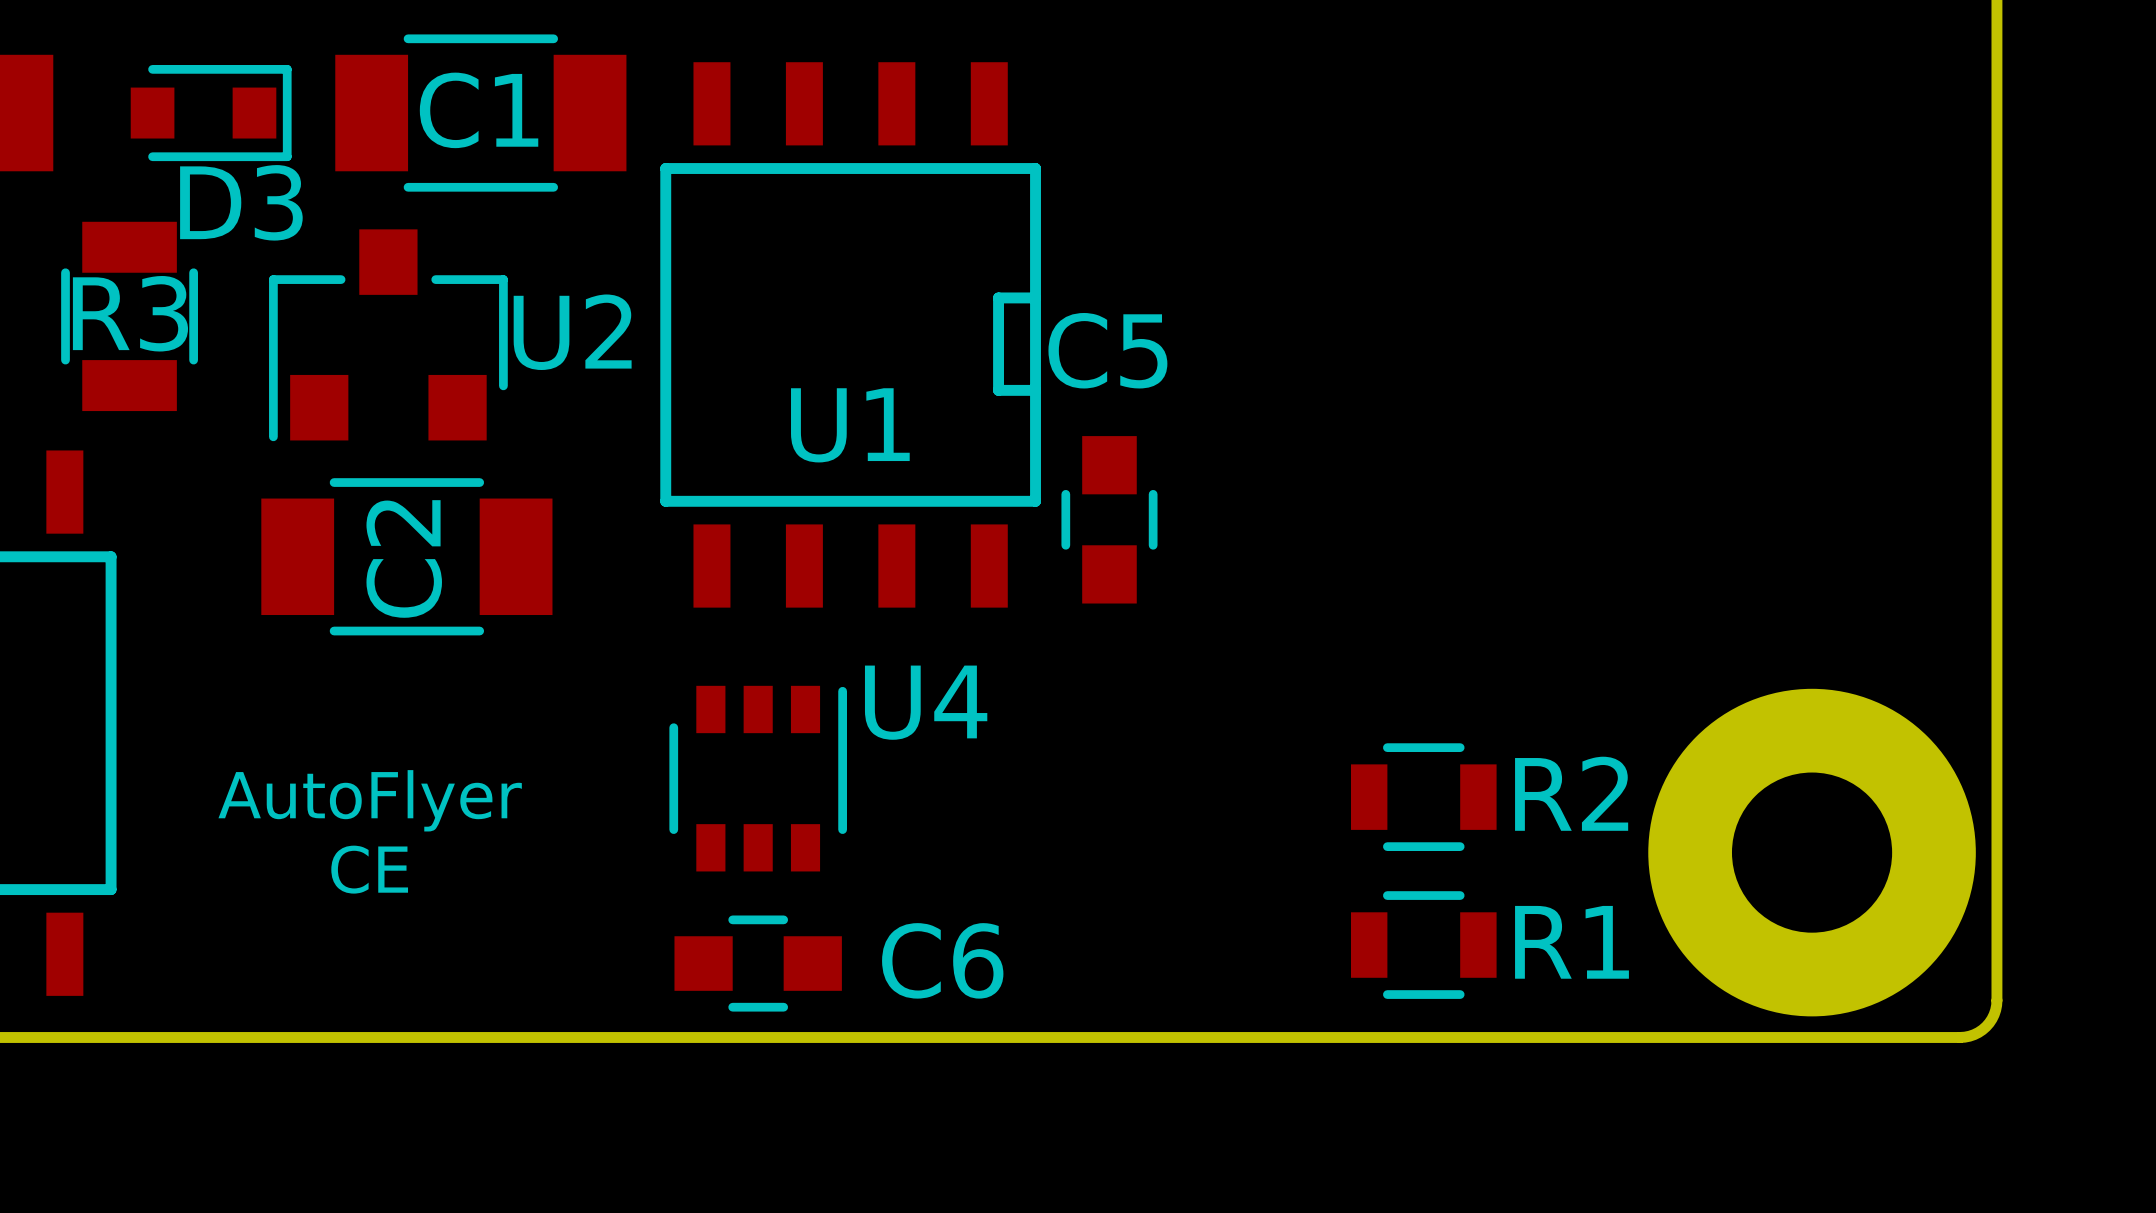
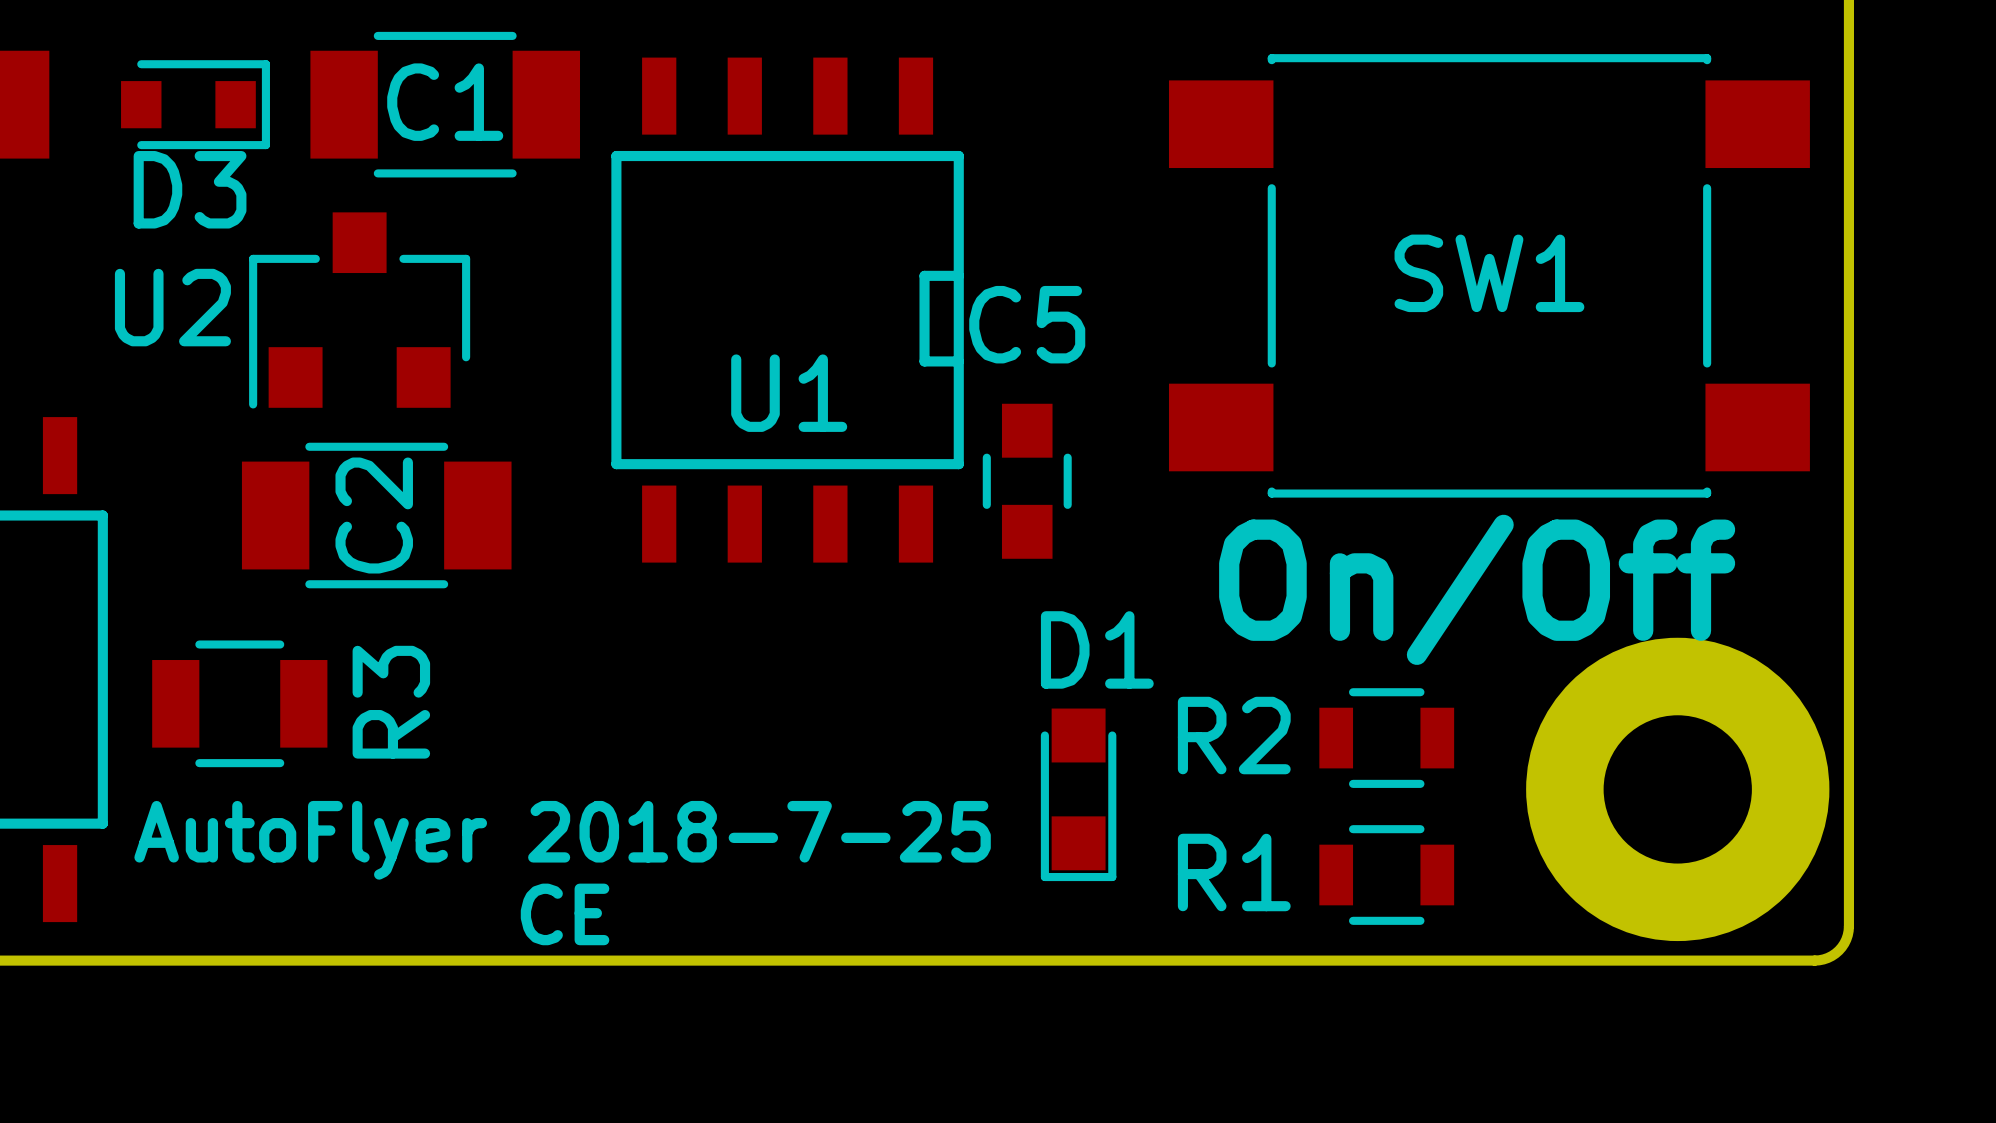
D3 name position: D3 (241, 202) -> D3 (190, 189)
SW1: none -> (1489, 275)
R3 name position: R3 (130, 313) -> R3 (391, 702)
R3 rotation: 0° (129, 316) -> 90° clockwise (239, 703)
R3 position: (129, 316) -> (239, 703)
U2 name position: U2 (572, 332) -> U2 (172, 307)
text: none -> On/Off (1477, 589)
U4: (758, 778) -> none
R2 name position: R2 (1571, 793) -> R2 (1234, 735)
R2 position: (1423, 797) -> (1386, 738)
text: AutoFlyer (370, 800) -> AutoFlyer 2018-7-25 (562, 840)
D1: none -> (1078, 794)
text position: CE (369, 869) -> CE (565, 914)
R1 name position: R1 (1571, 942) -> R1 (1234, 872)
R1 position: (1423, 945) -> (1386, 875)
C6: (758, 963) -> none

